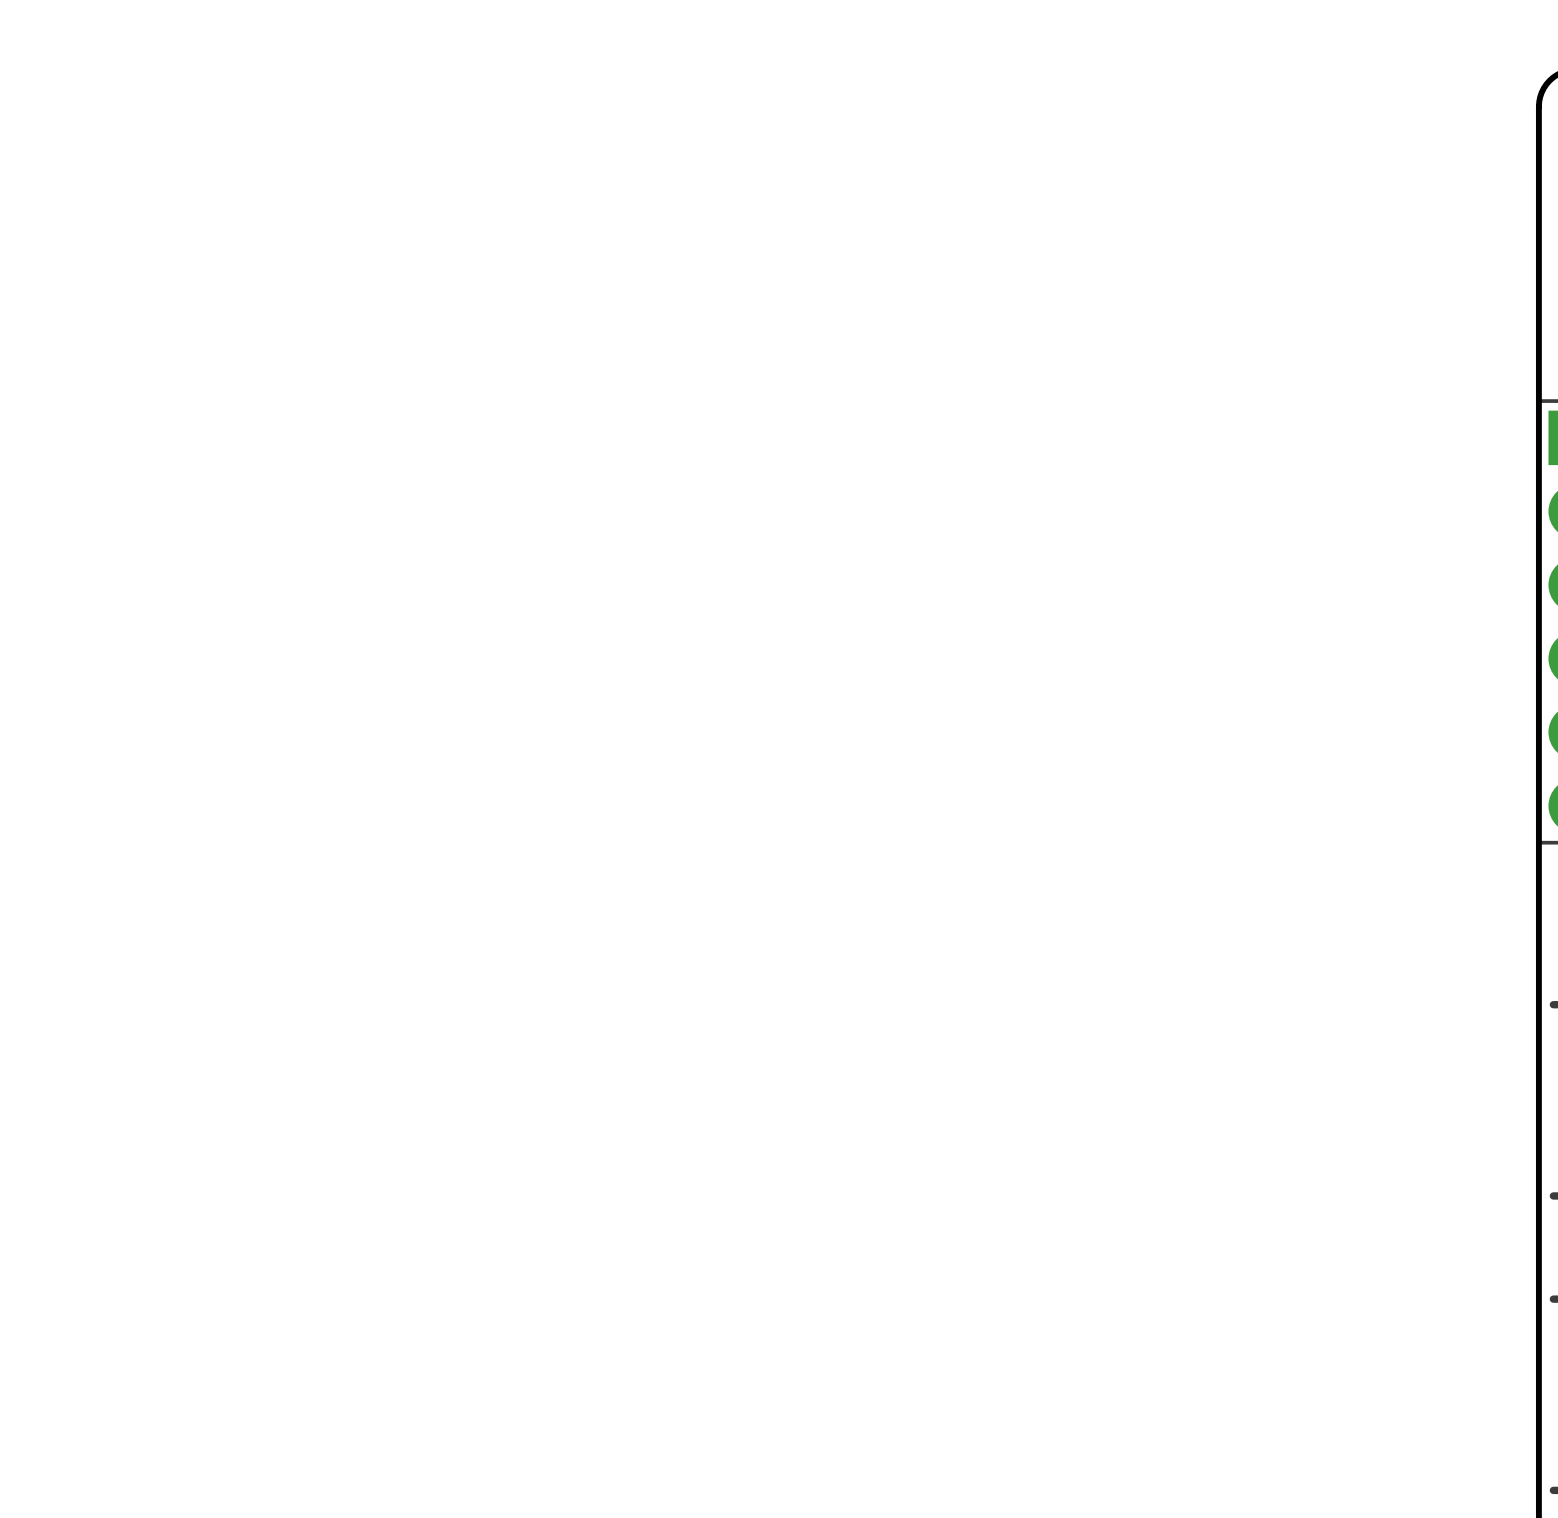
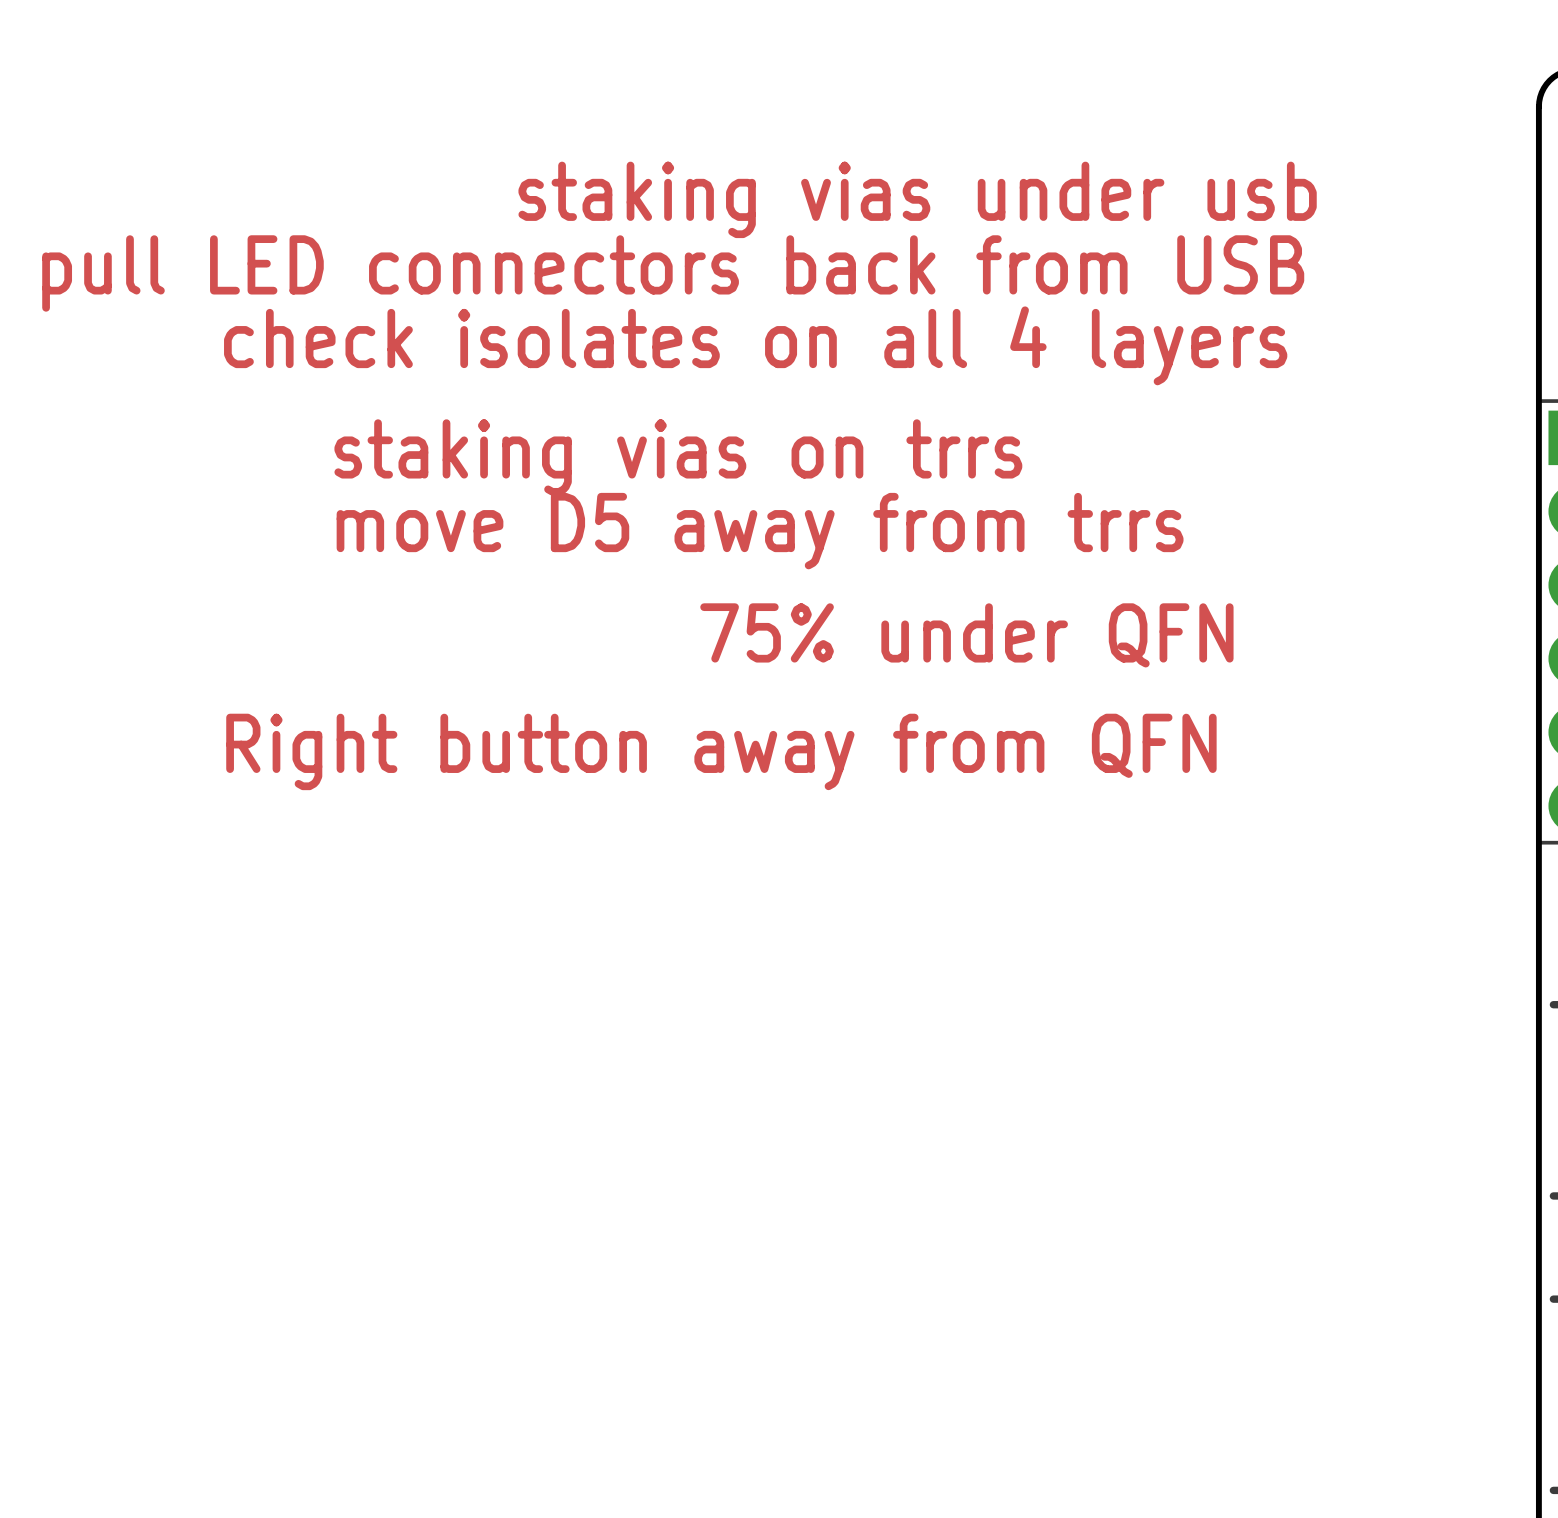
text: none -> staking vias under usb (917, 199)
text: none -> pull LED connectors back from USB (673, 273)
text: none -> check isolates on all 4 layers (755, 345)
text: none -> staking vias on trrs (678, 457)
text: none -> move D5 away from trrs (760, 531)
text: none -> 75% under QFN (966, 635)
text: none -> Right button away from QFN (721, 751)

